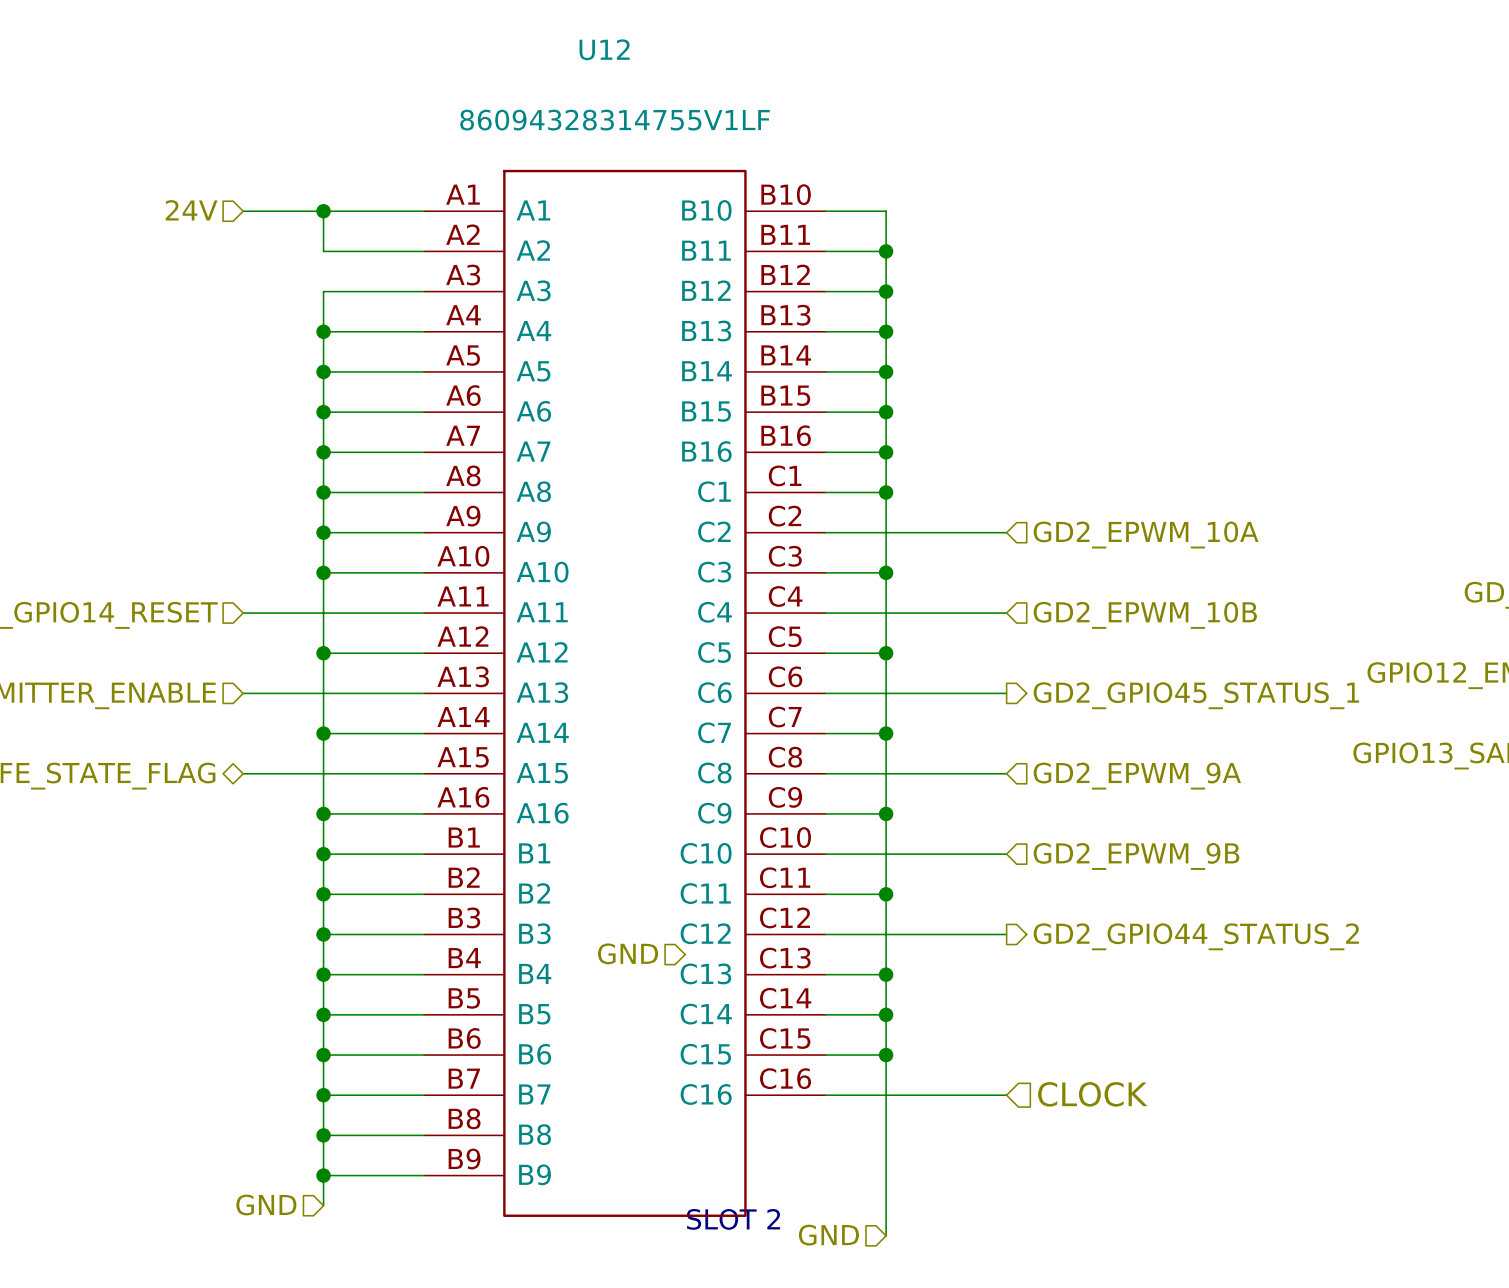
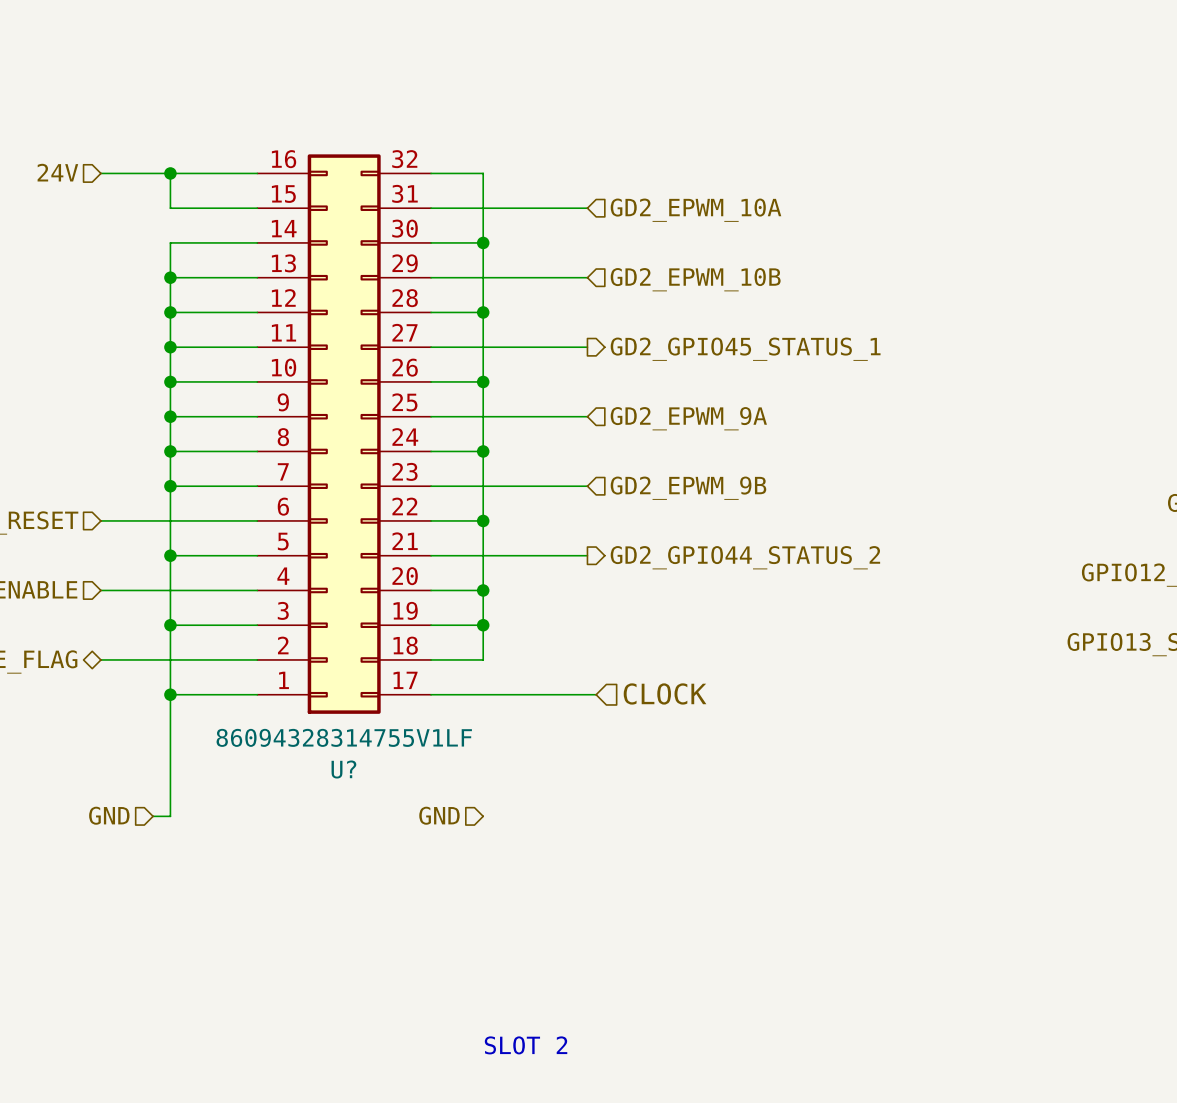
wire: none -> (431, 173) (483, 173) (483, 659) (431, 659)
wire: (825, 211) (886, 211) (886, 1235) -> none
wire: (825, 251) (886, 251) -> none
junction: (886, 251) -> none
junction: none -> (483, 242)
wire: (825, 291) (886, 291) -> none
junction: (886, 291) -> none
wire: (825, 331) (886, 331) -> none
junction: (886, 331) -> none
junction: none -> (483, 312)
wire: (825, 371) (886, 371) -> none
junction: (886, 371) -> none
wire: (825, 412) (886, 412) -> none
junction: (886, 412) -> none
junction: none -> (483, 381)
wire: (825, 452) (886, 452) -> none
junction: (886, 452) -> none
wire: (825, 492) (886, 492) -> none
junction: (886, 492) -> none
U?: none -> 86094328314755V1LF (344, 434)
junction: none -> (483, 451)
wire: (825, 532) (1006, 532) -> (431, 208) (587, 208)
hierarchical label position: GD2_EPWM_10A (1146, 535) -> GD2_EPWM_10A (695, 210)
wire: (825, 572) (886, 572) -> (431, 242) (483, 242)
junction: (886, 572) -> none
junction: none -> (483, 520)
wire: (825, 613) (1006, 613) -> (431, 277) (587, 277)
hierarchical label position: GD2_EPWM_10B (1145, 615) -> GD2_EPWM_10B (695, 279)
wire: (825, 653) (886, 653) -> (431, 312) (483, 312)
junction: (886, 653) -> none
U12: 86094328314755V1LF (624, 693) -> none
junction: none -> (483, 590)
wire: (825, 693) (1006, 693) -> (431, 347) (587, 347)
hierarchical label position: GD2_GPIO45_STATUS_1 (1196, 695) -> GD2_GPIO45_STATUS_1 (745, 349)
junction: none -> (483, 625)
wire: (825, 733) (886, 733) -> (431, 381) (483, 381)
junction: (886, 733) -> none
wire: (825, 773) (1006, 773) -> (431, 416) (587, 416)
hierarchical label position: GD2_EPWM_9A (1137, 776) -> GD2_EPWM_9A (688, 418)
wire: none -> (431, 694) (596, 694)
wire: (825, 813) (886, 813) -> (431, 451) (483, 451)
junction: (886, 813) -> none
wire: (323, 854) (424, 854) -> none
junction: (323, 854) -> none
wire: (825, 854) (1006, 854) -> (431, 486) (587, 486)
hierarchical label position: GD2_EPWM_9B (1136, 856) -> GD2_EPWM_9B (688, 488)
wire: (323, 894) (424, 894) -> none
junction: (323, 894) -> none
wire: (825, 894) (886, 894) -> (431, 520) (483, 520)
junction: (886, 894) -> none
wire: (323, 934) (424, 934) -> none
junction: (323, 934) -> none
wire: (825, 934) (1006, 934) -> (431, 555) (587, 555)
hierarchical label position: GD2_GPIO44_STATUS_2 (1196, 936) -> GD2_GPIO44_STATUS_2 (745, 557)
wire: (323, 954) (323, 1205) -> (170, 816) (153, 816)
wire: (323, 974) (424, 974) -> none
junction: (323, 974) -> none
wire: (825, 974) (886, 974) -> (431, 590) (483, 590)
junction: (886, 974) -> none
wire: (323, 1014) (424, 1014) -> none
junction: (323, 1014) -> none
wire: (825, 1014) (886, 1014) -> (431, 625) (483, 625)
junction: (886, 1014) -> none
wire: (323, 1055) (424, 1055) -> none
junction: (323, 1055) -> none
wire: (825, 1055) (886, 1055) -> none
junction: (886, 1055) -> none
hierarchical label position: CLOCK (1092, 1094) -> CLOCK (665, 693)
wire: (323, 1095) (424, 1095) -> none
junction: (323, 1095) -> none
wire: (825, 1095) (1006, 1095) -> none
wire: (323, 1135) (424, 1135) -> none
junction: (323, 1135) -> none
wire: (323, 1175) (424, 1175) -> none
junction: (323, 1175) -> none
hierarchical label position: GND (266, 1204) -> GND (109, 815)
hierarchical label: GND (828, 1235) -> none

